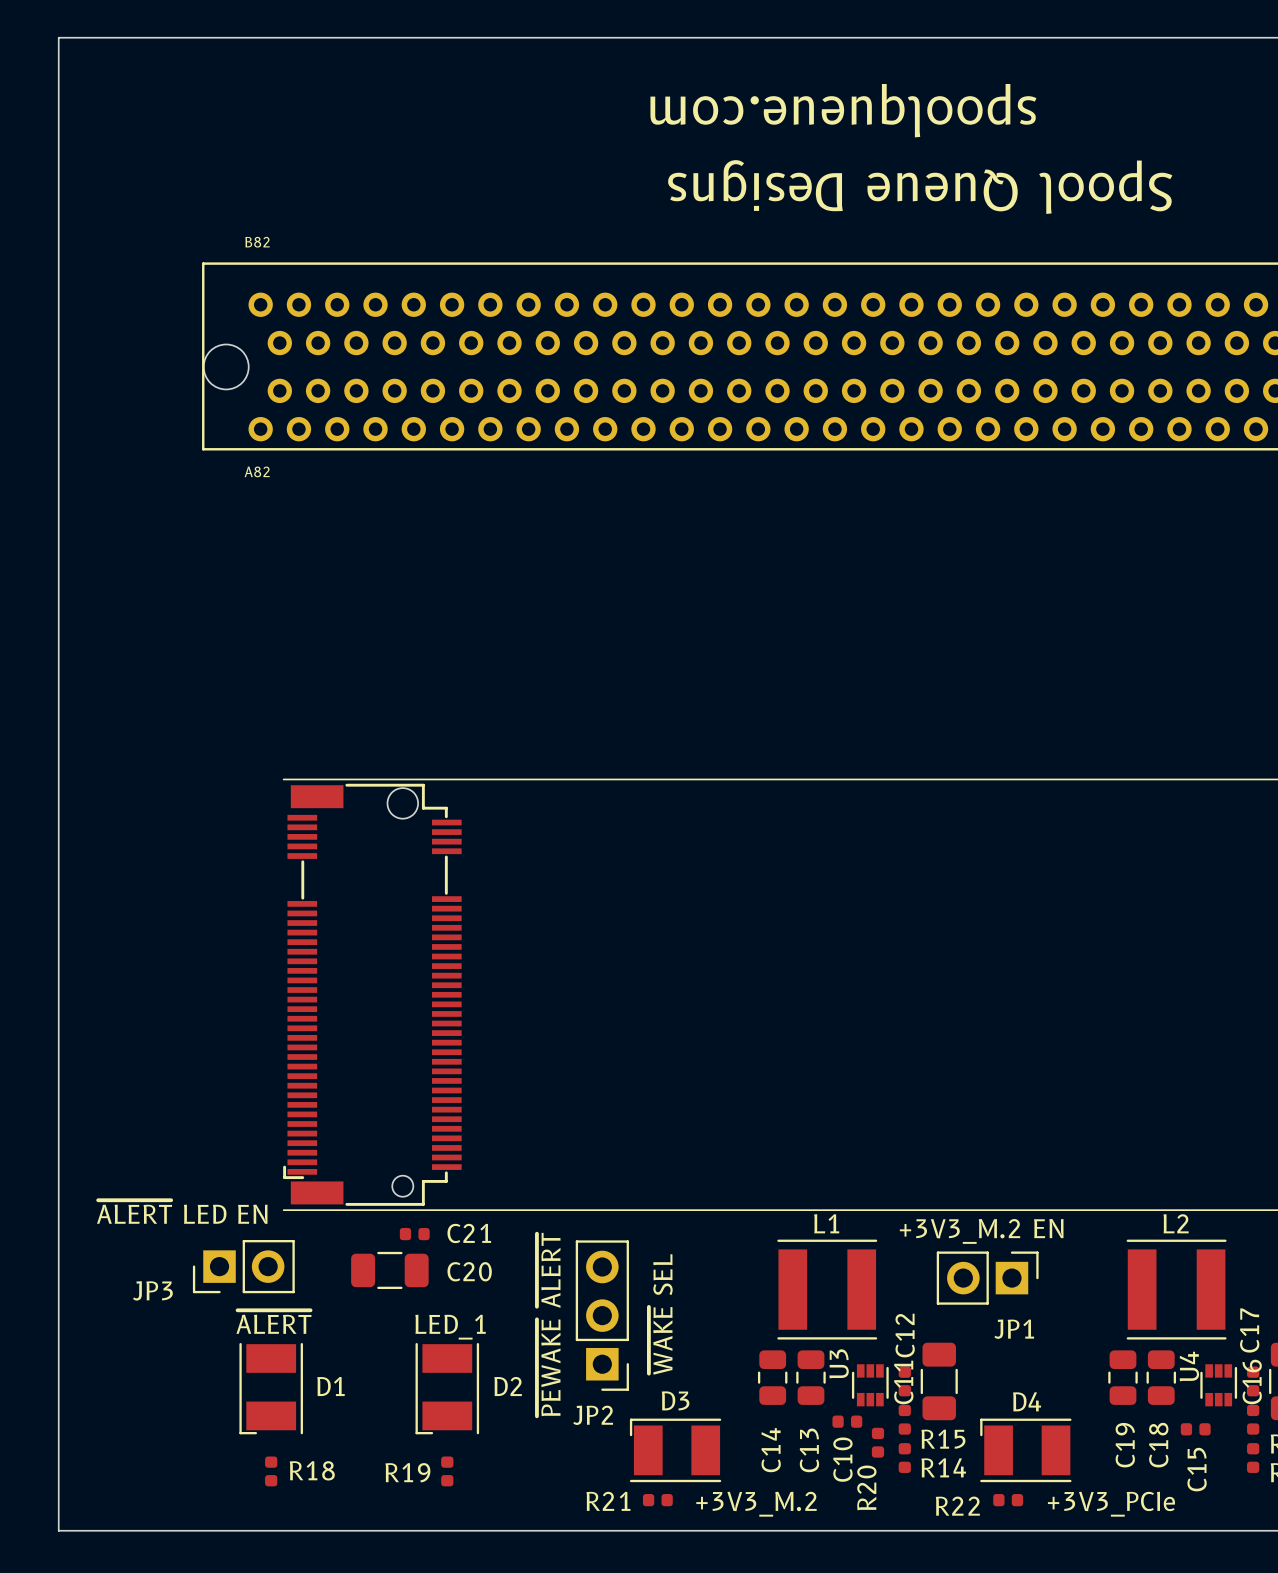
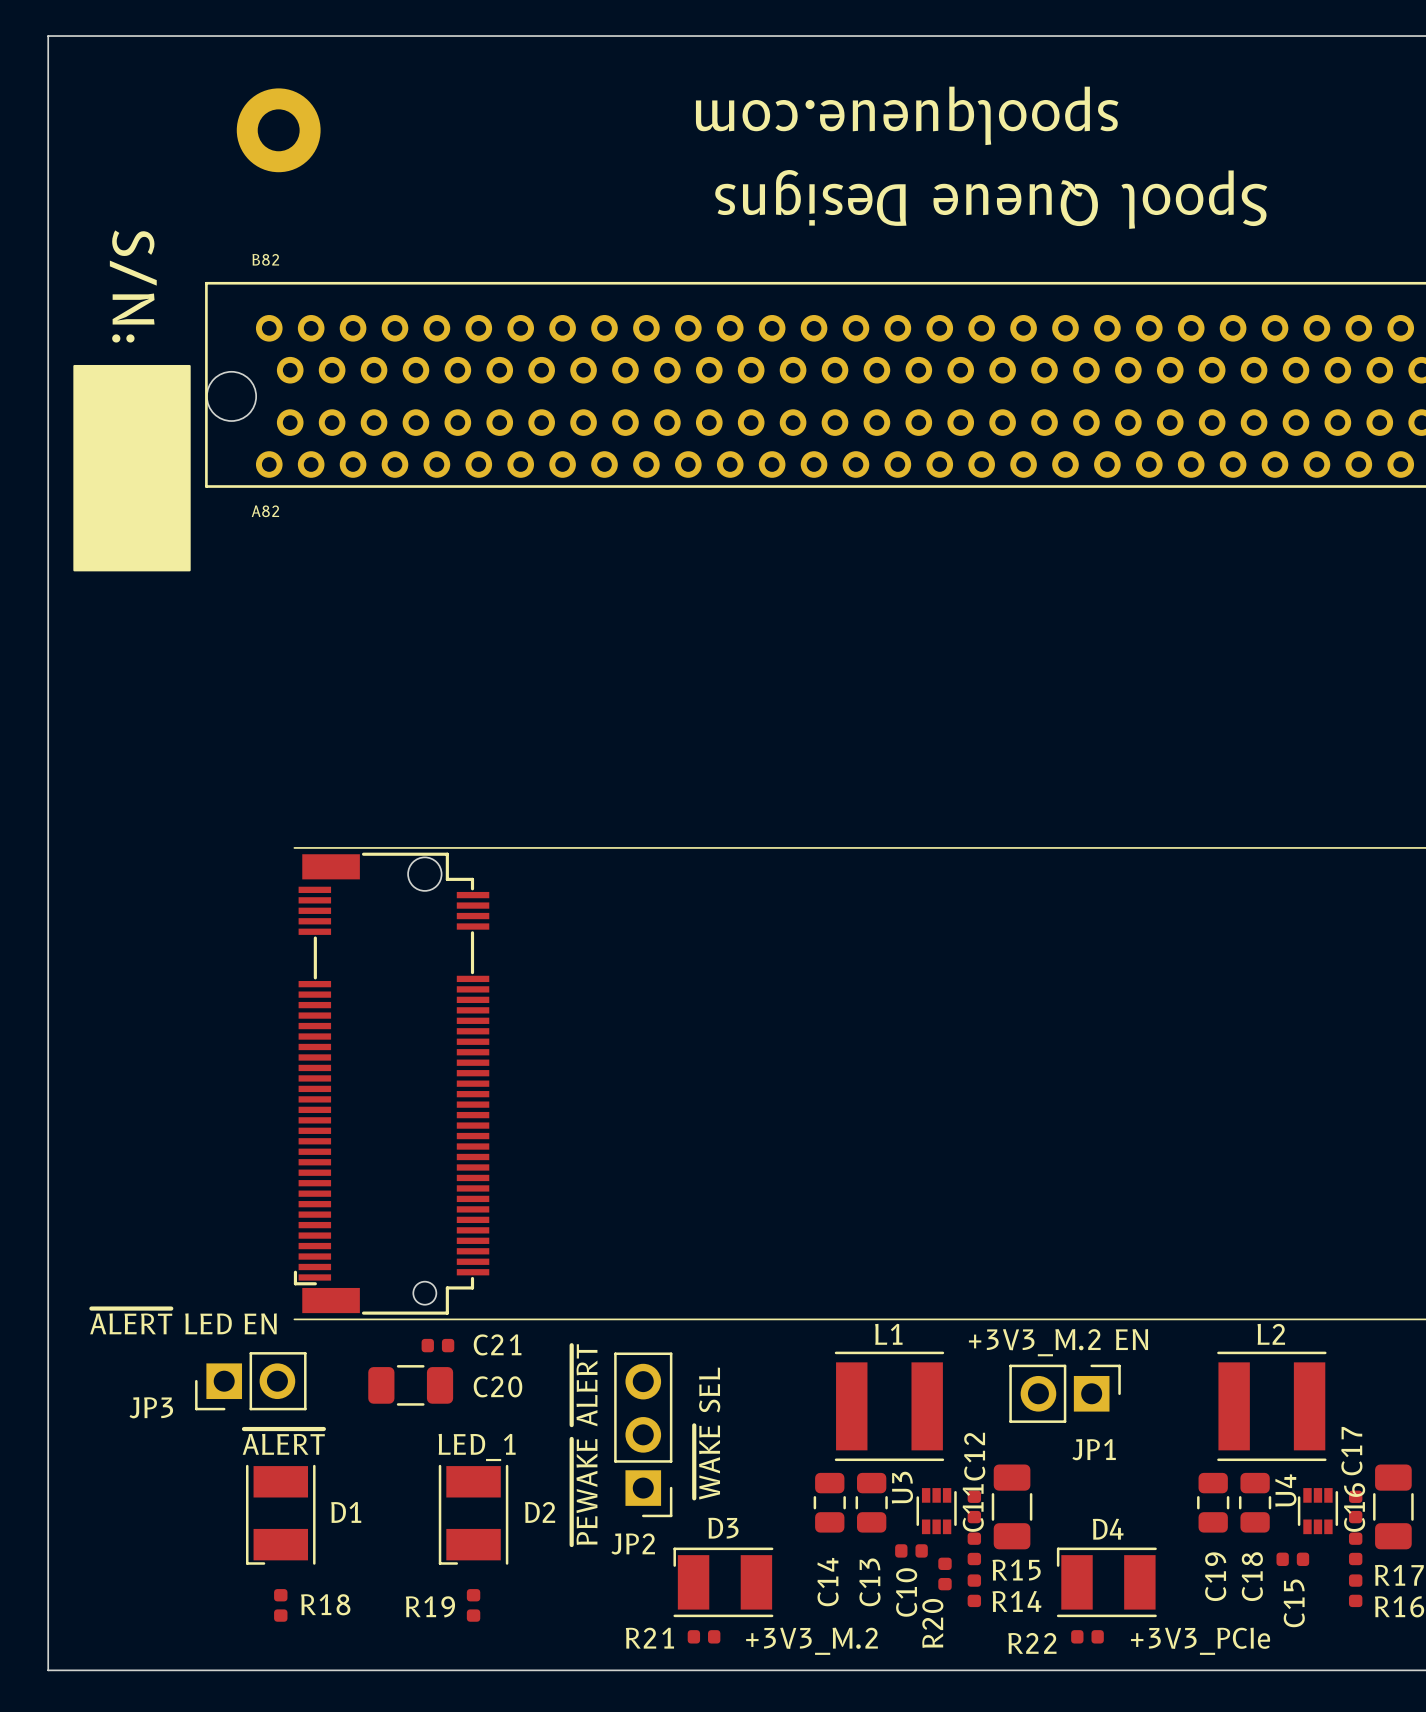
part: none -> (278, 130)
text: none -> S/N: (133, 286)
drawing: none -> [73, 364, 191, 572]

